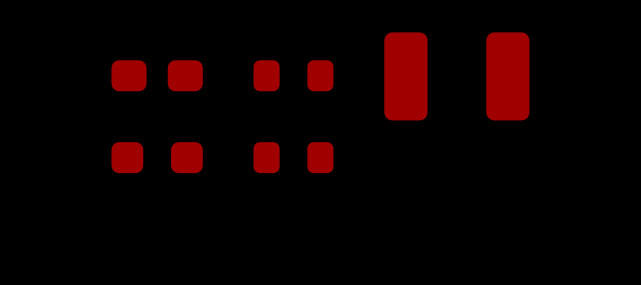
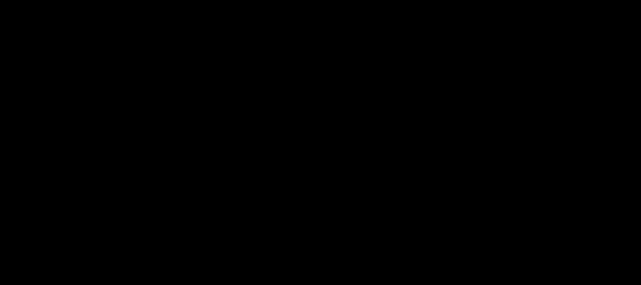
part: (157, 75) -> none
part: (293, 75) -> none
part: (456, 76) -> none
part: (157, 157) -> none
part: (293, 157) -> none

